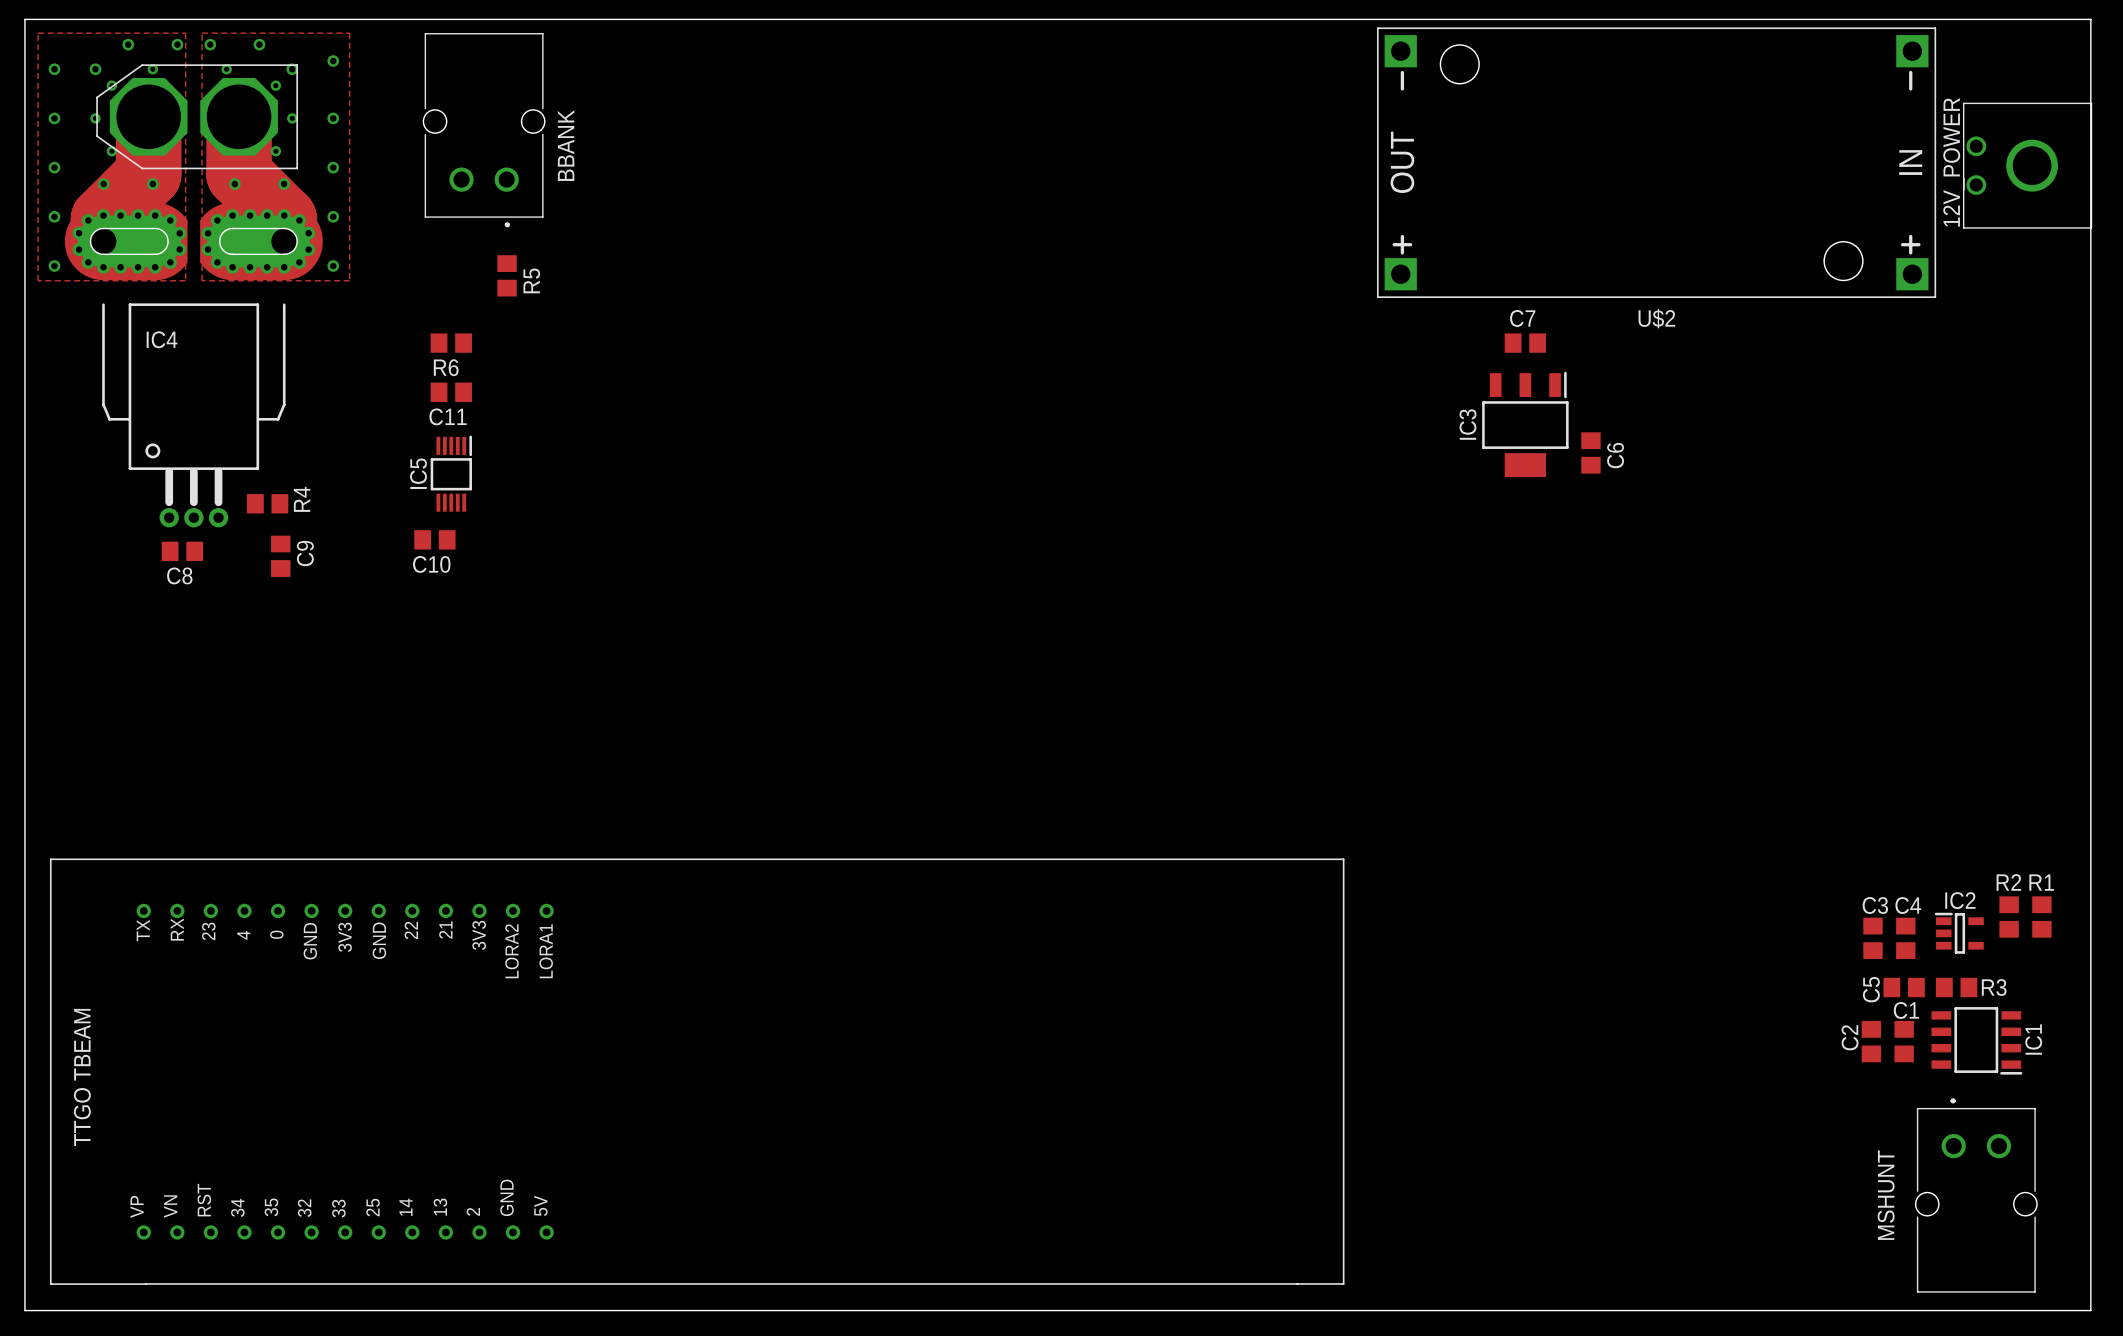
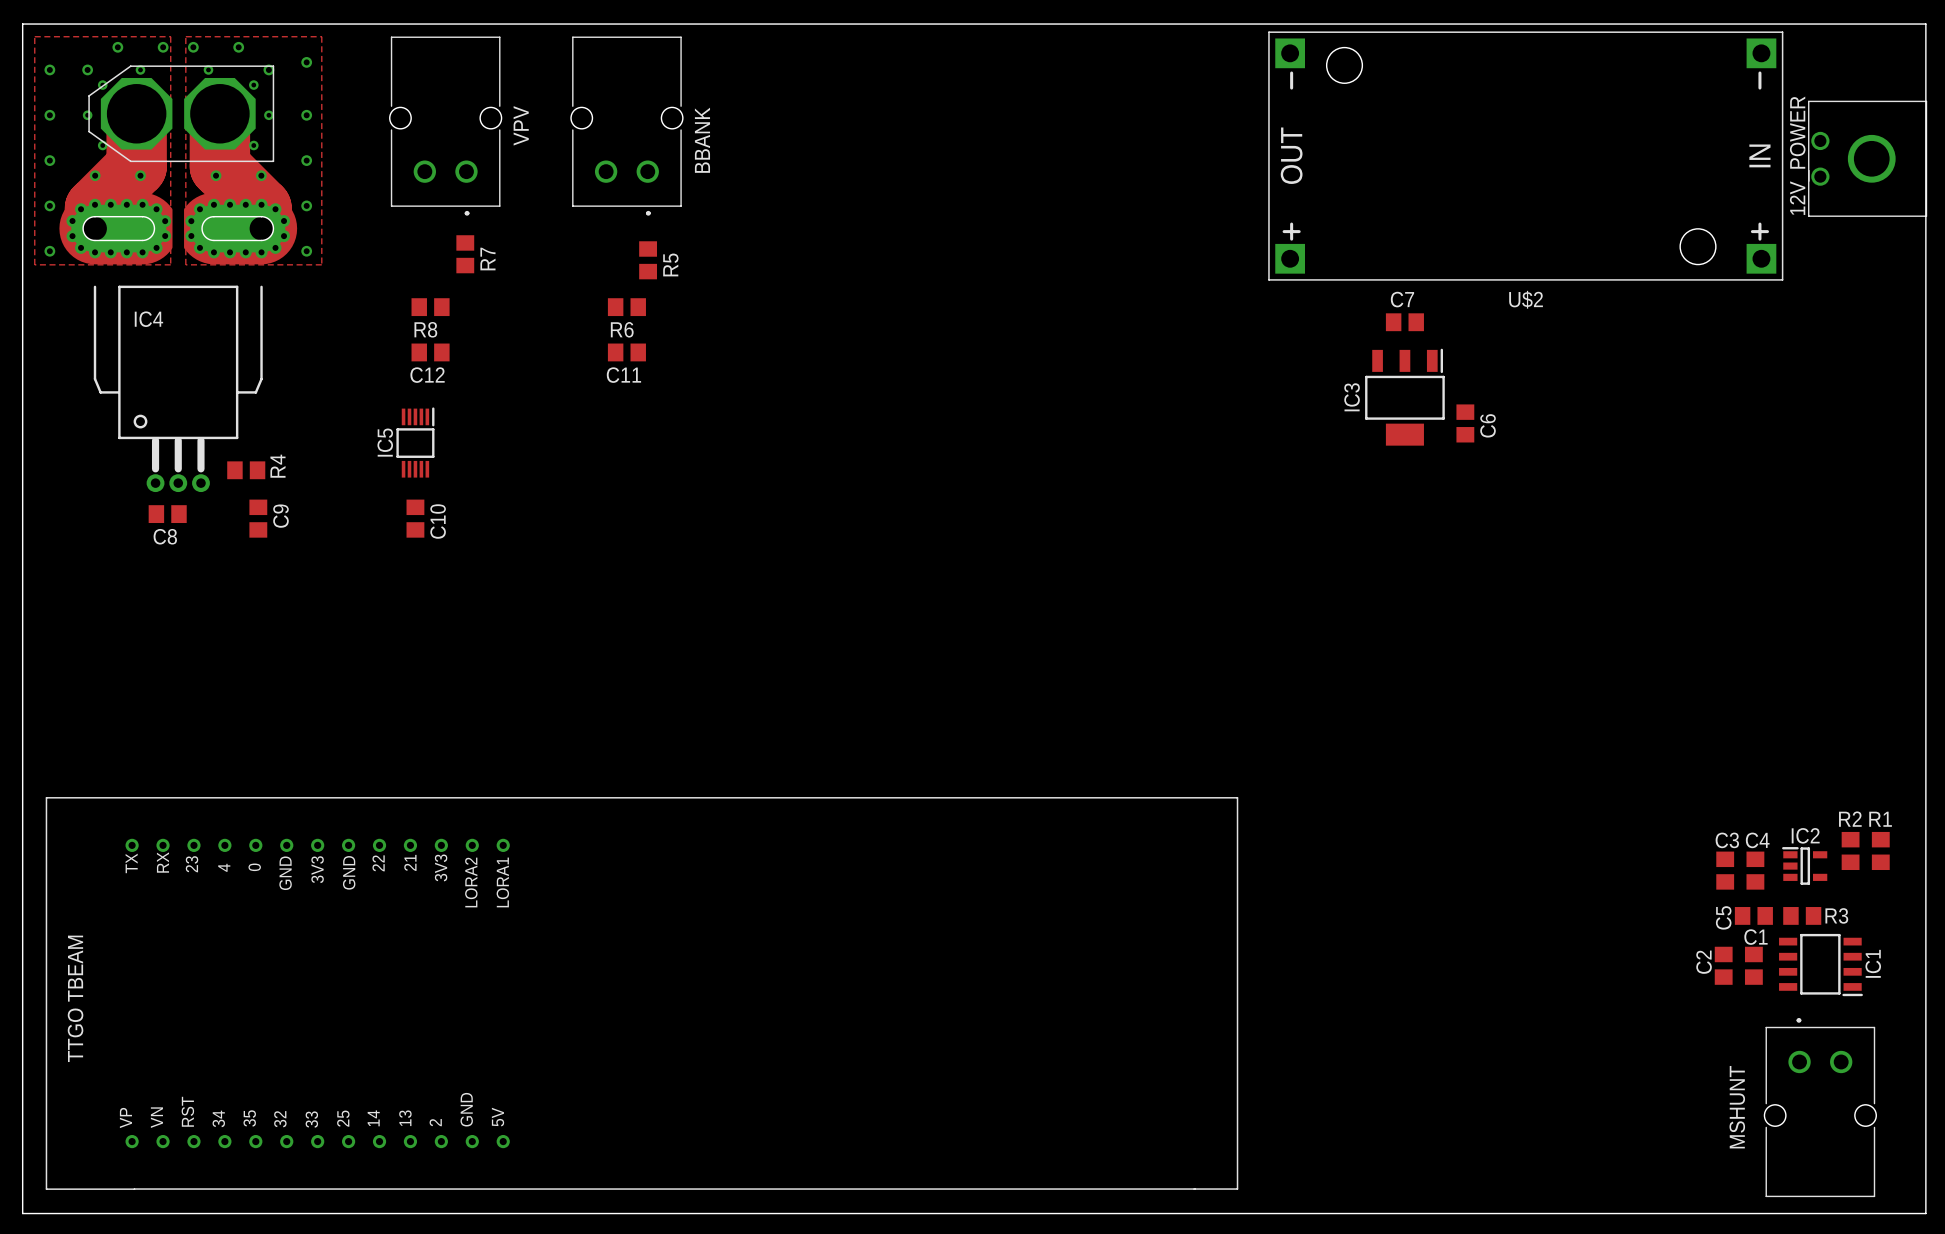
BBANK: none -> (626, 126)
BBANK name: BBANK (566, 145) -> VPV (521, 125)
R7: none -> (465, 254)
R5 position: (507, 275) -> (648, 260)
R8: none -> (430, 307)
R6 position: (451, 343) -> (626, 307)
C12: none -> (430, 352)
C11 position: (451, 392) -> (626, 352)
C10 rotation: 0° (434, 539) -> 90° clockwise (415, 518)
C10 name position: C10 (431, 564) -> C10 (438, 521)

